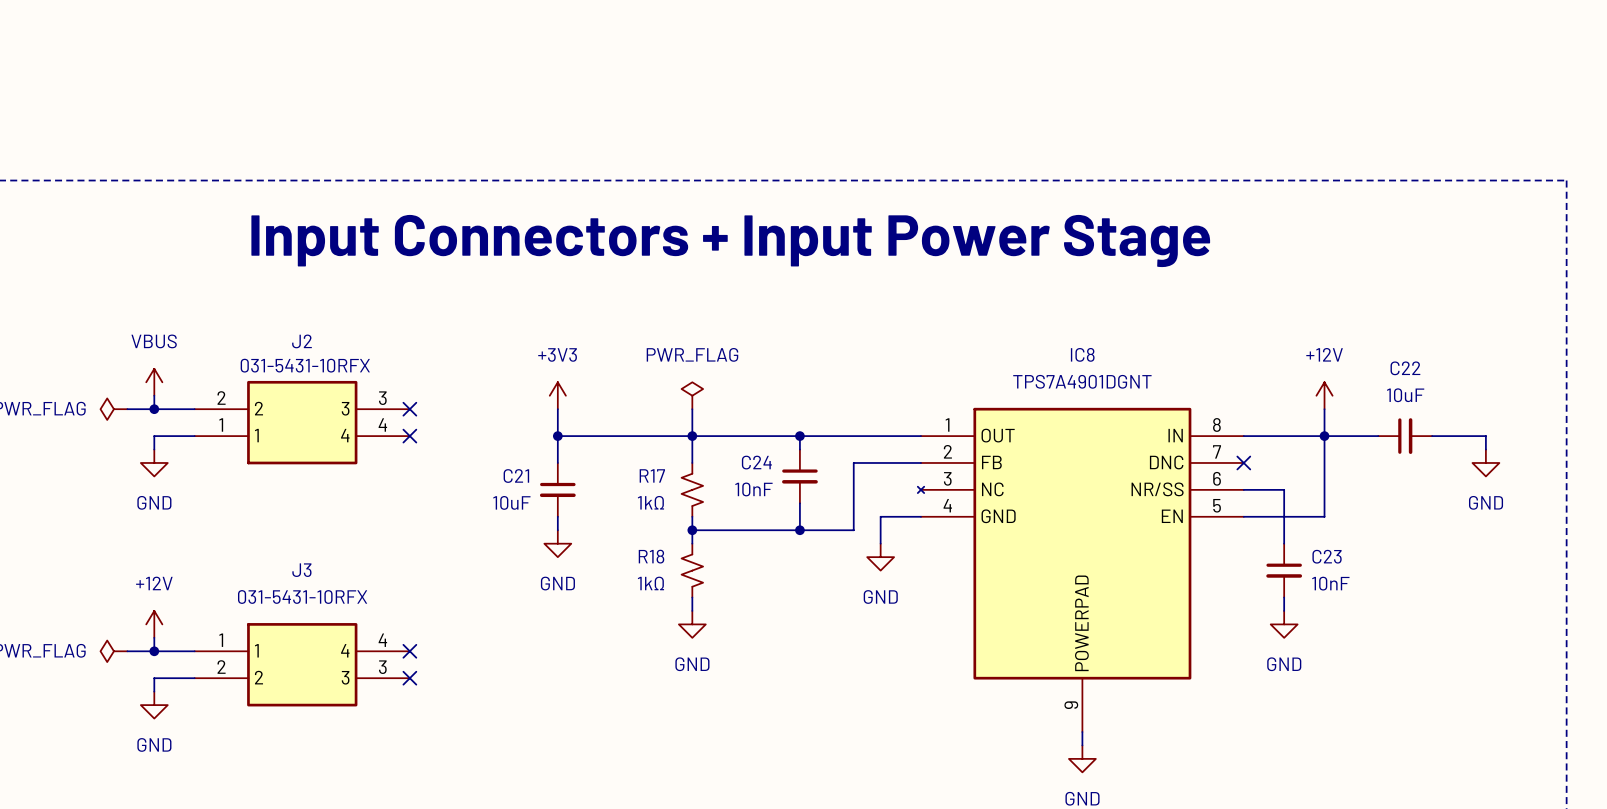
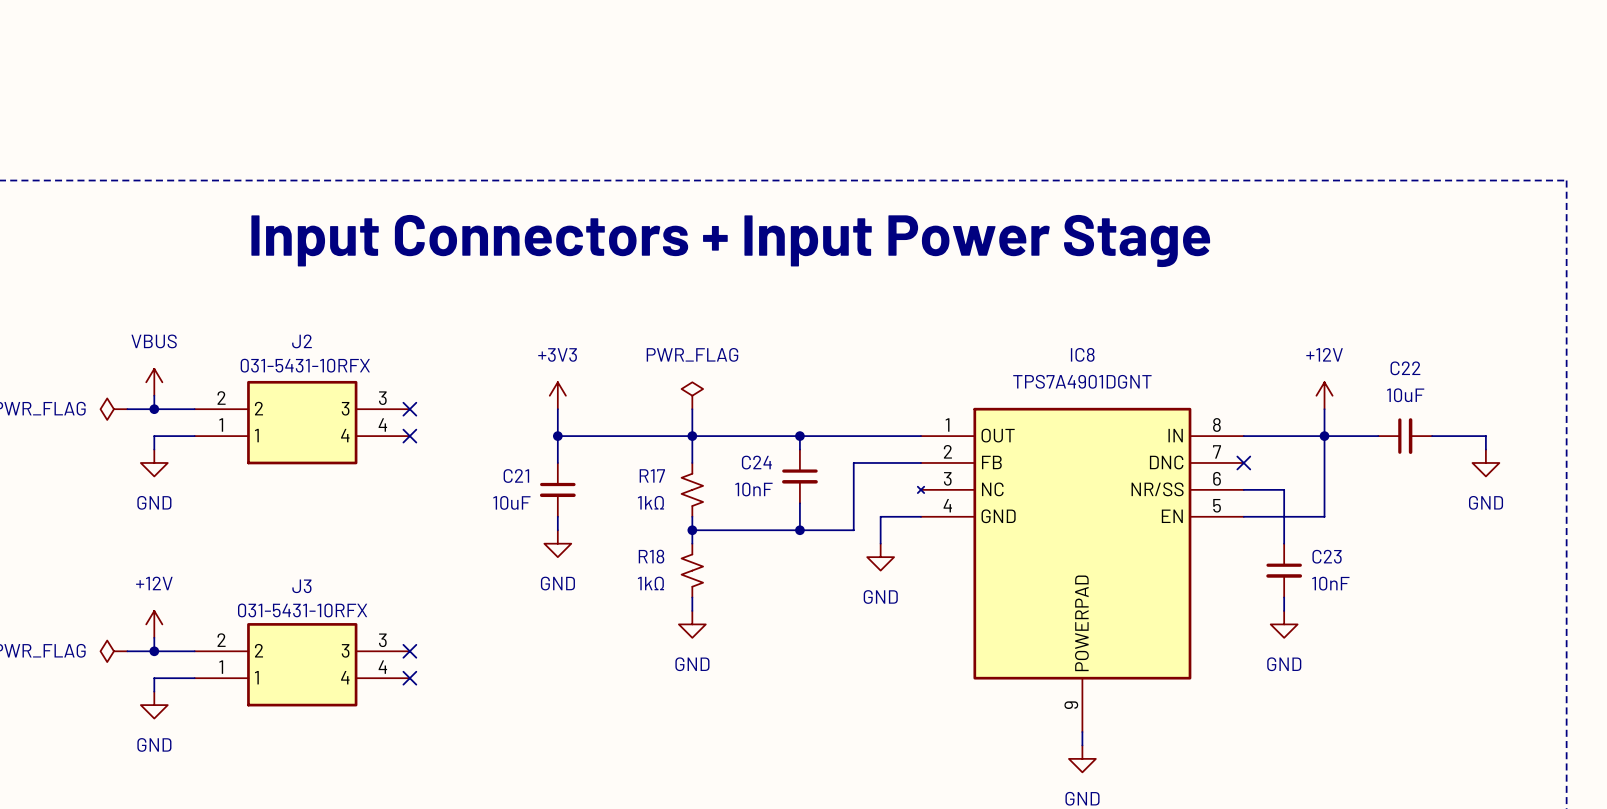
J3 flip: as is (302, 664) -> up-down (302, 664)

